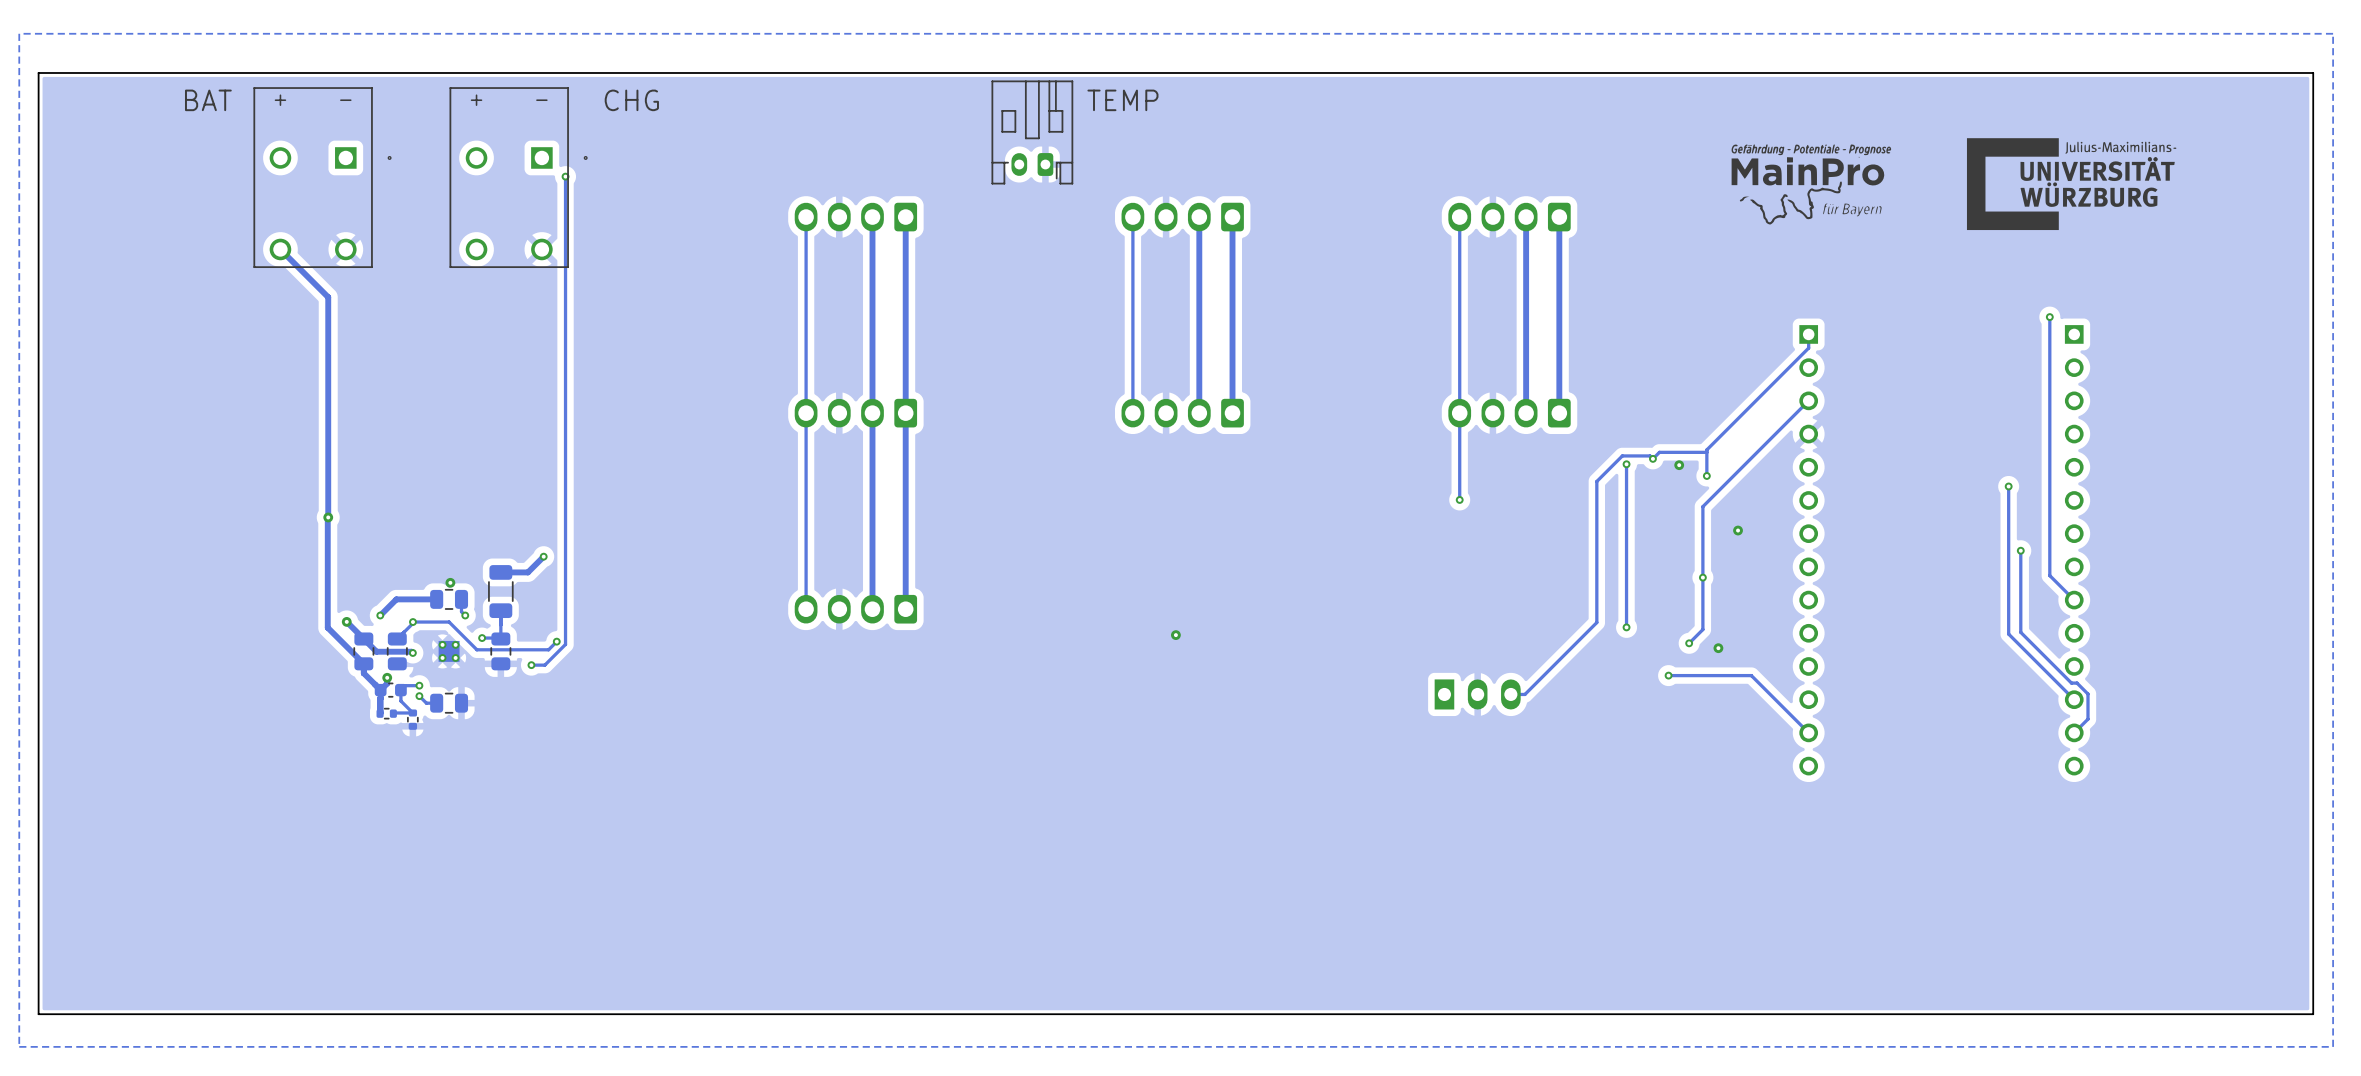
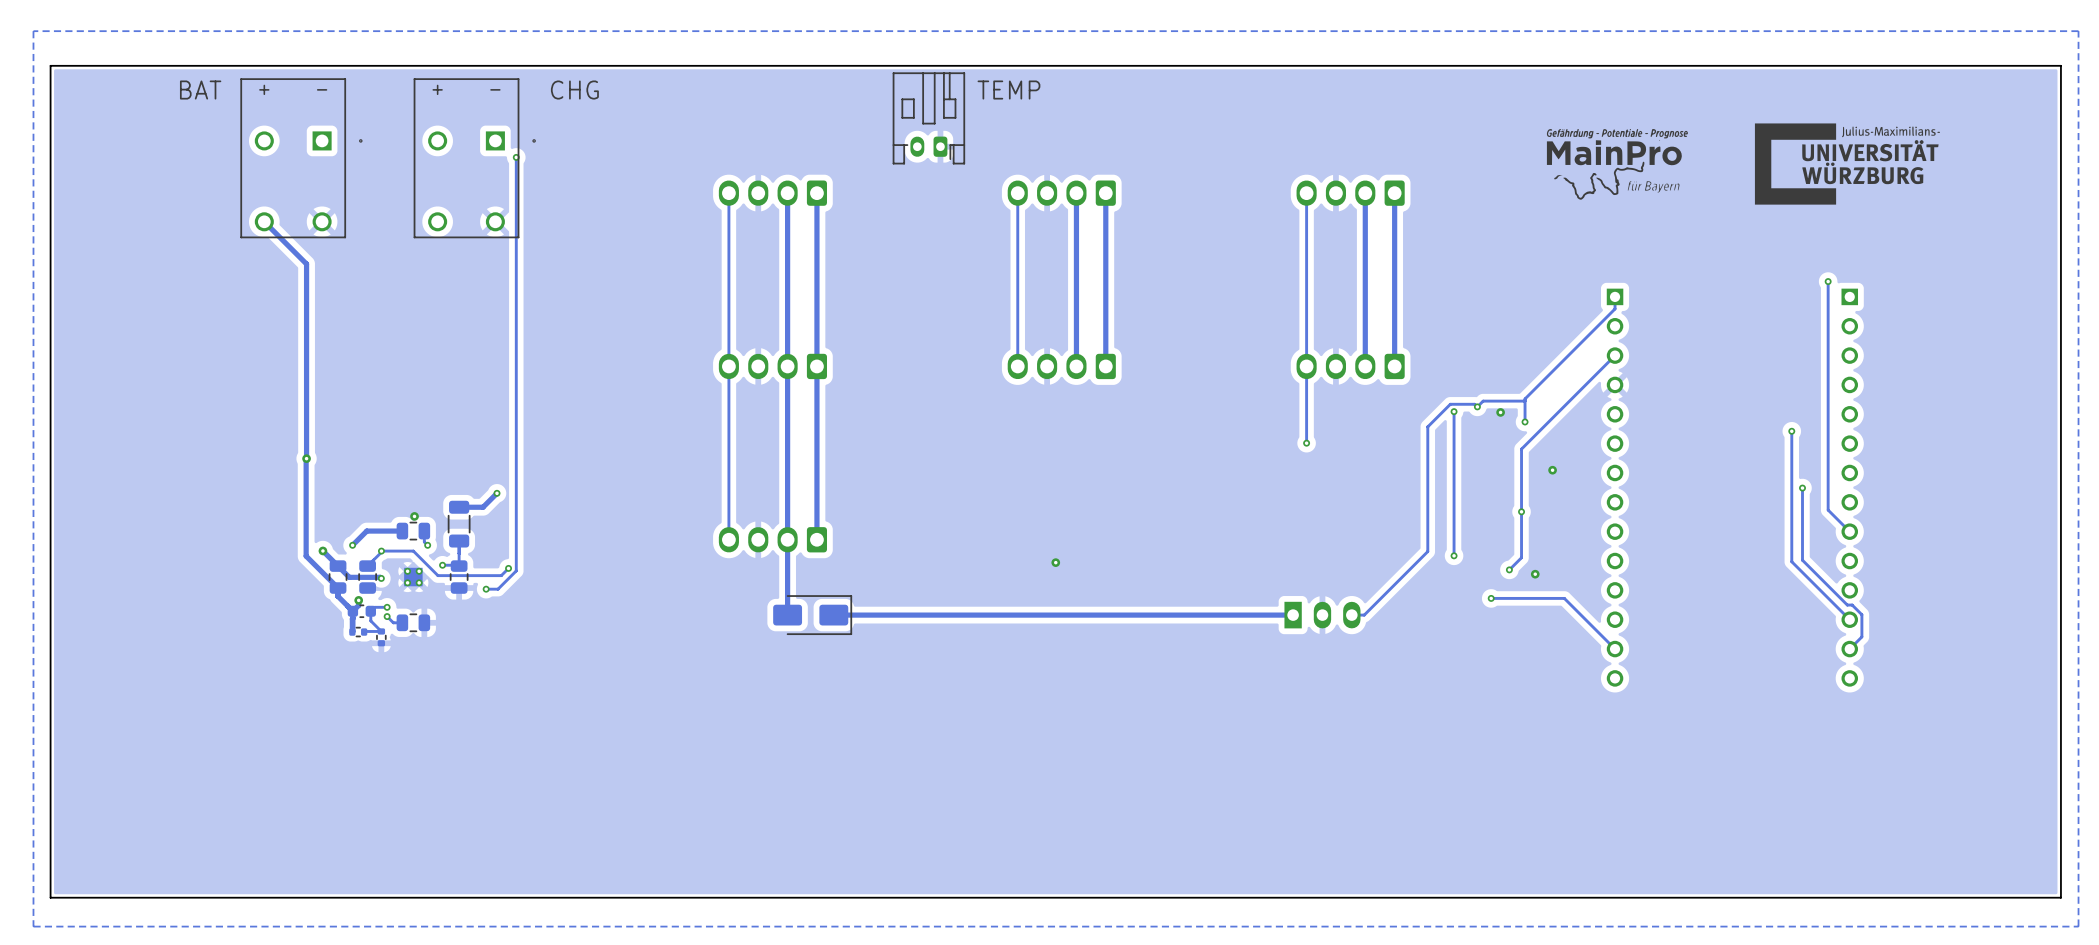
track: none -> (787, 539) (787, 615)
part: none -> (812, 615)
track: none -> (1293, 615) (833, 615)

